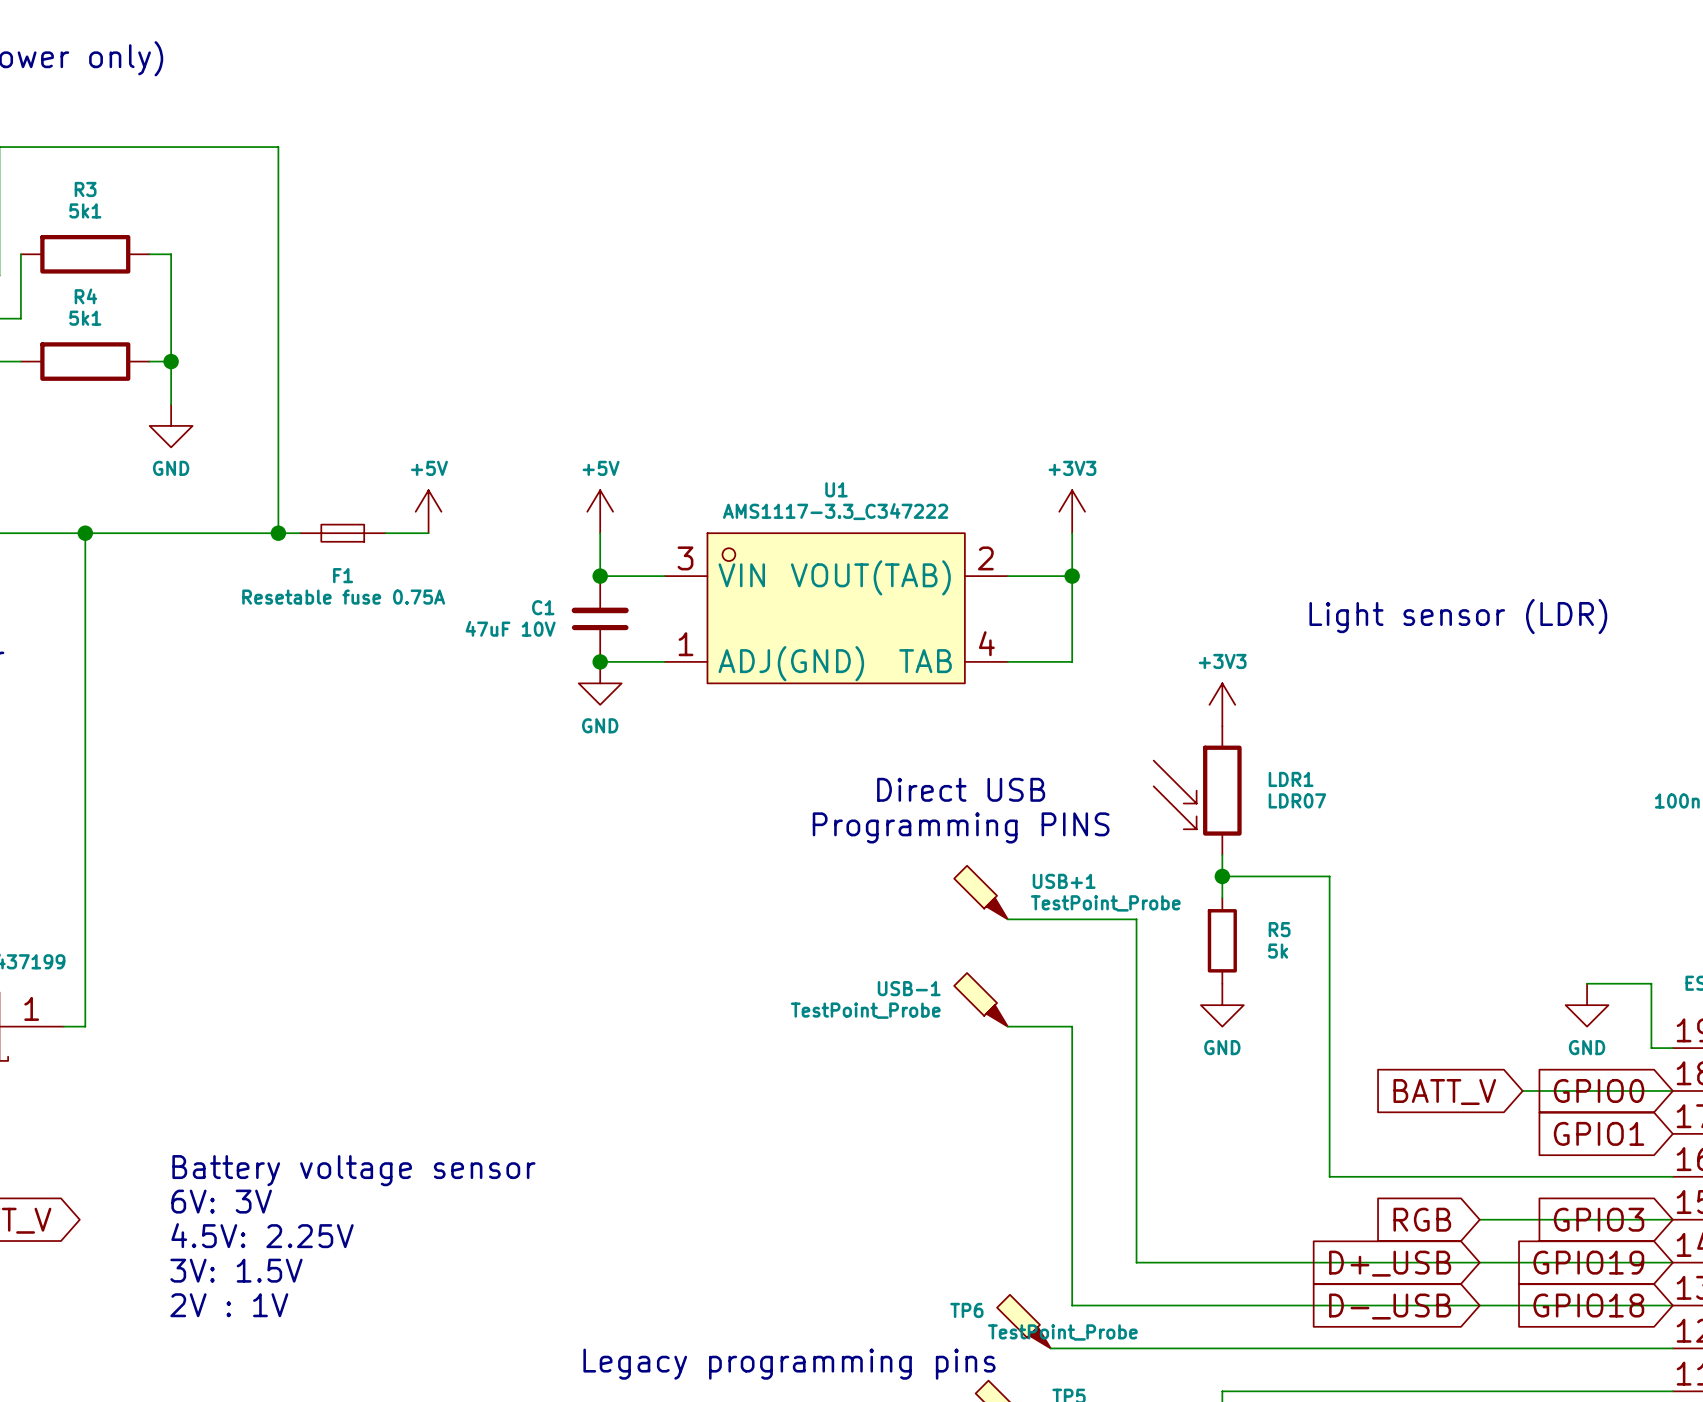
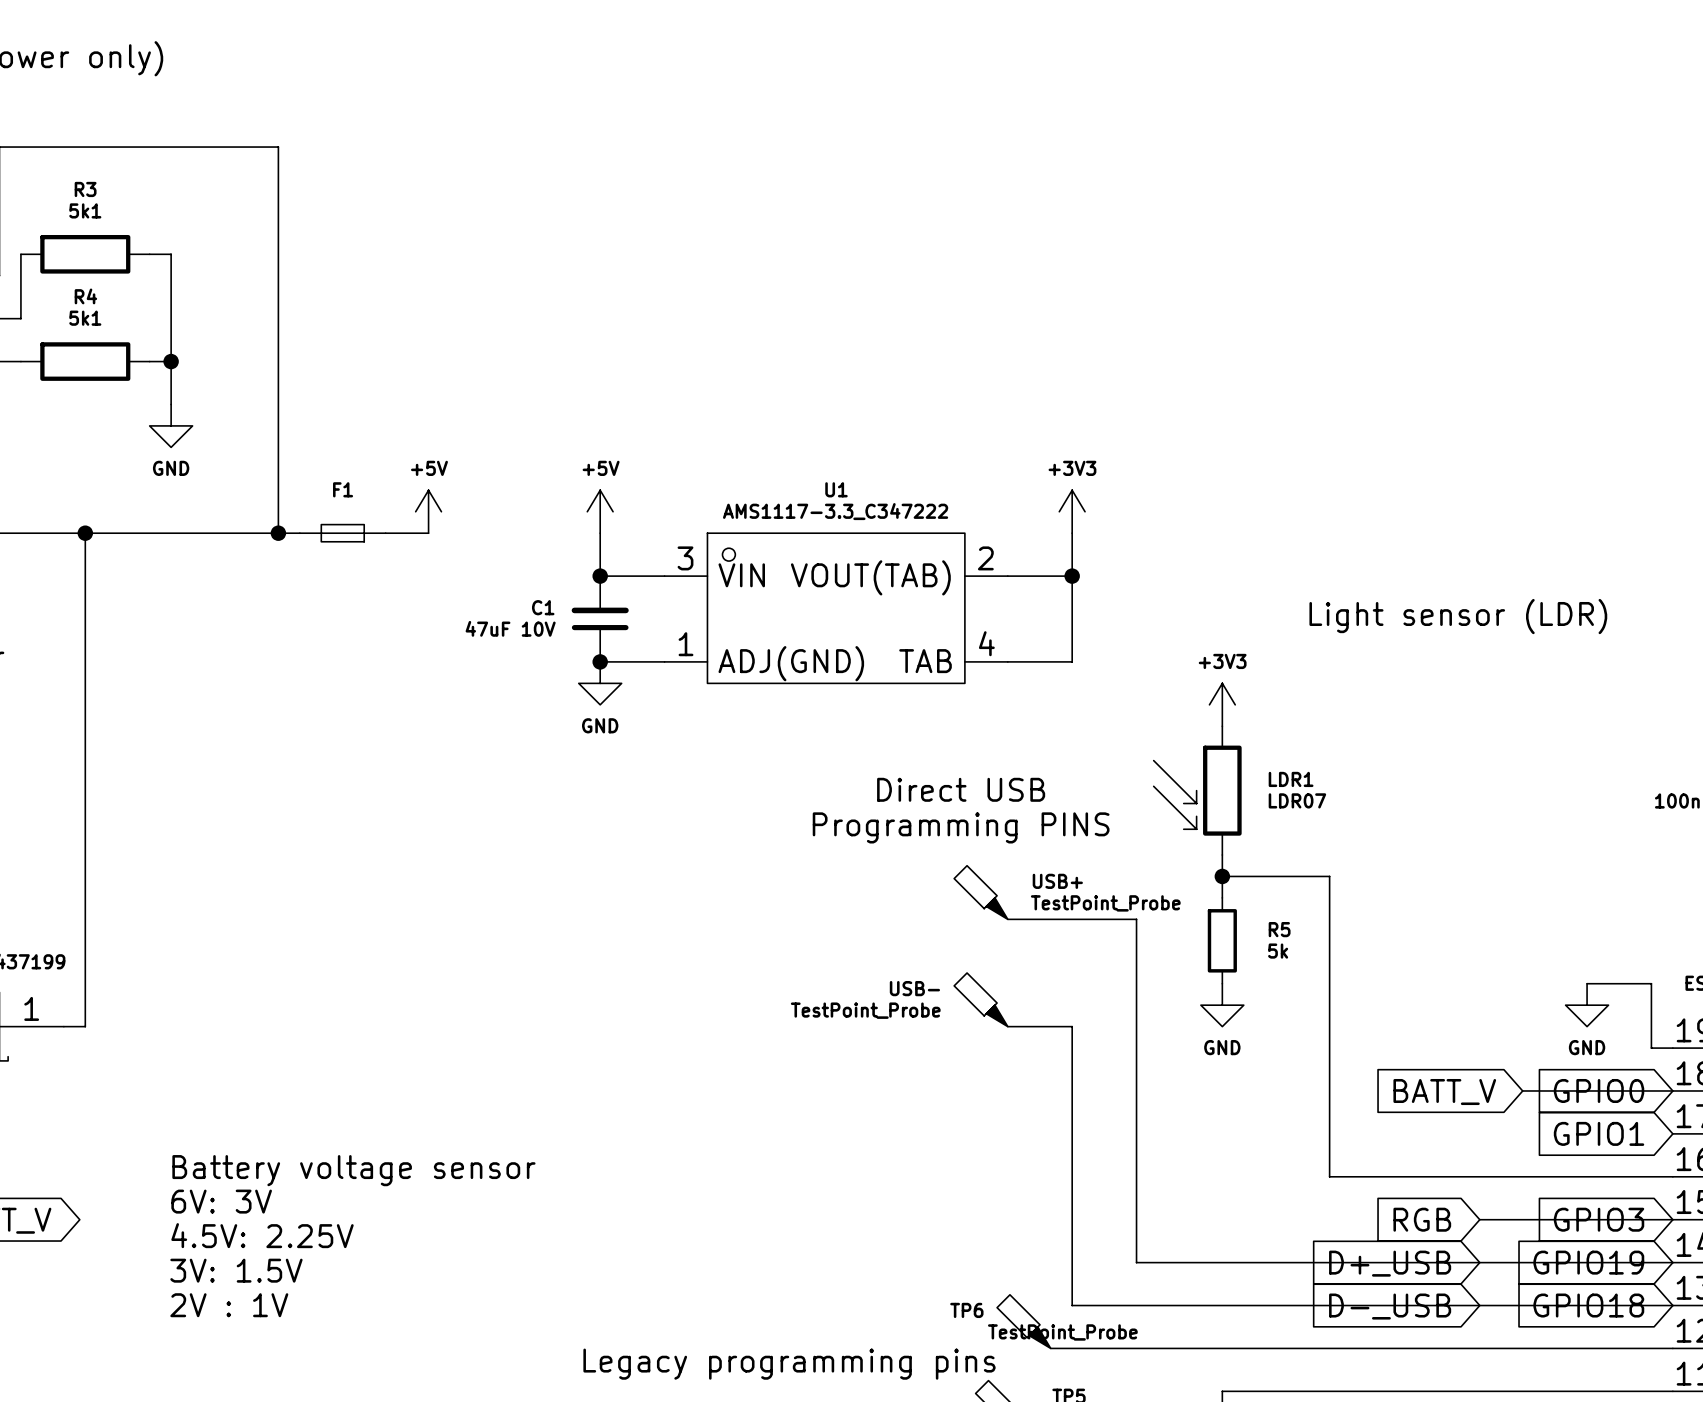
F1 name position: F1 (343, 575) -> F1 (343, 489)
F1 value: Resetable fuse 0.75A (343, 597) -> none
USB+1 name: USB+1 (1064, 881) -> USB+ (1057, 881)
USB-1 name: USB-1 (909, 988) -> USB- (914, 988)

